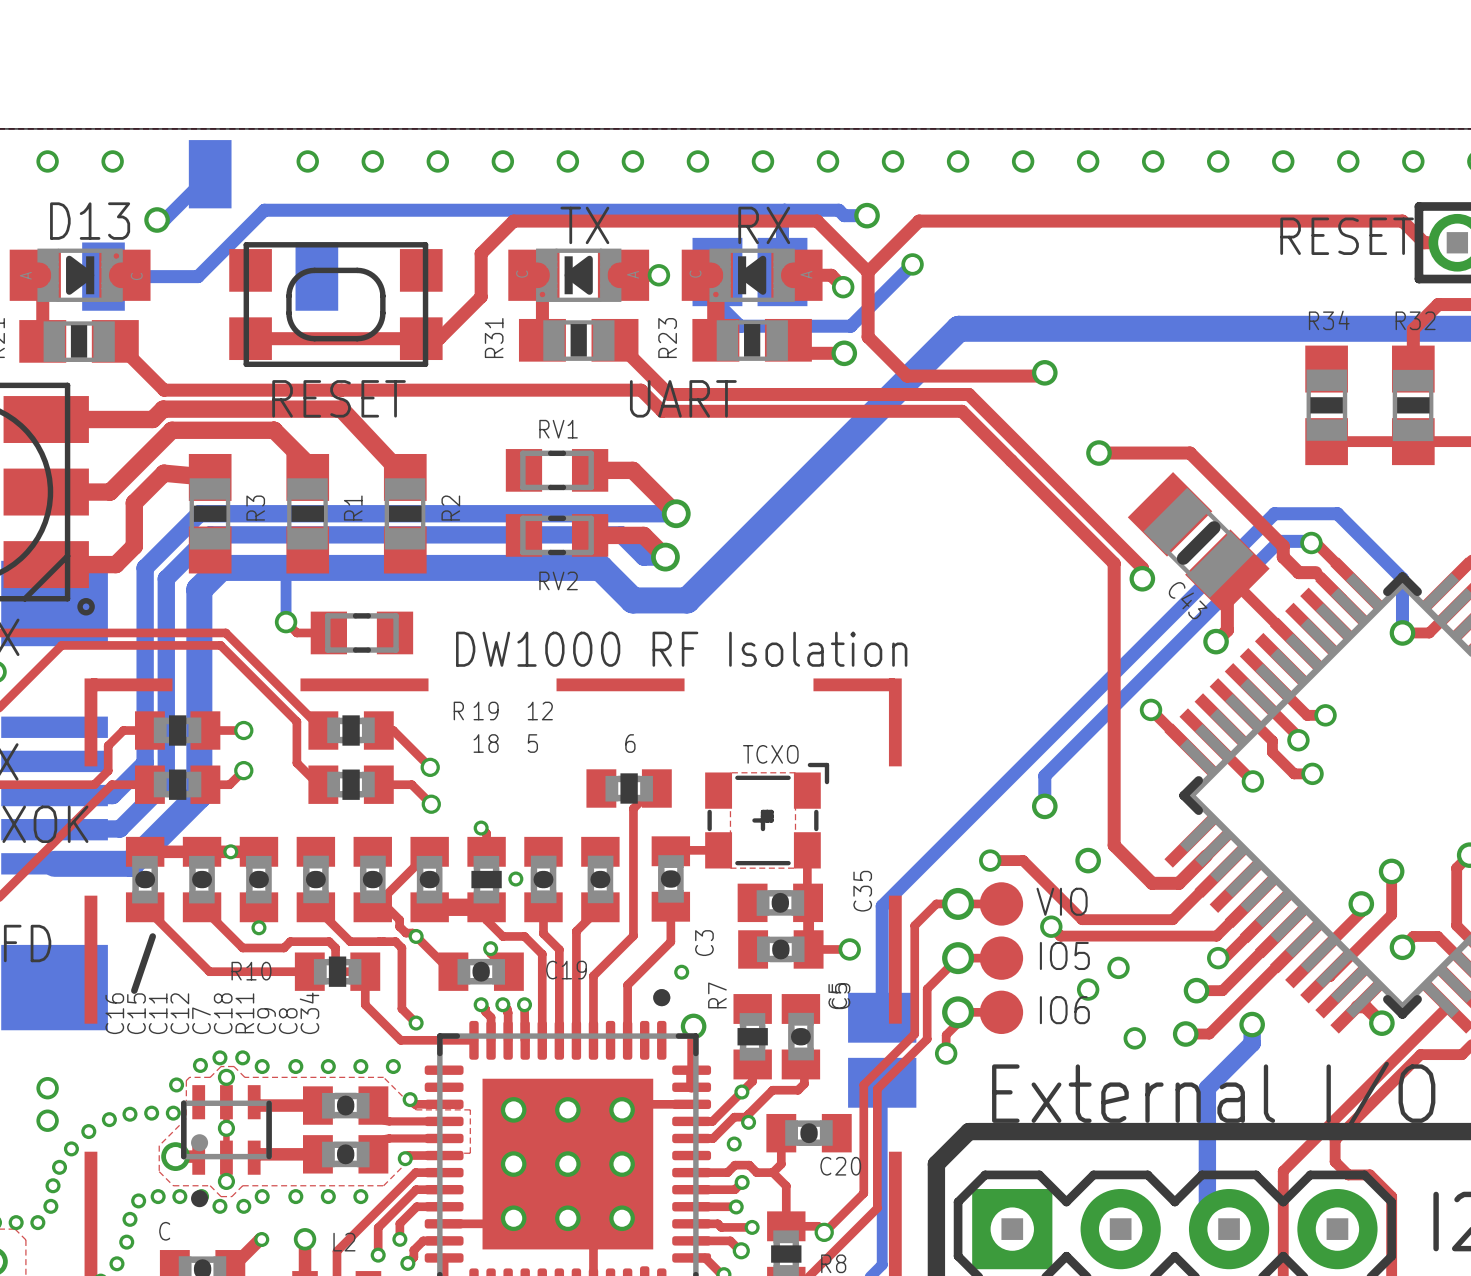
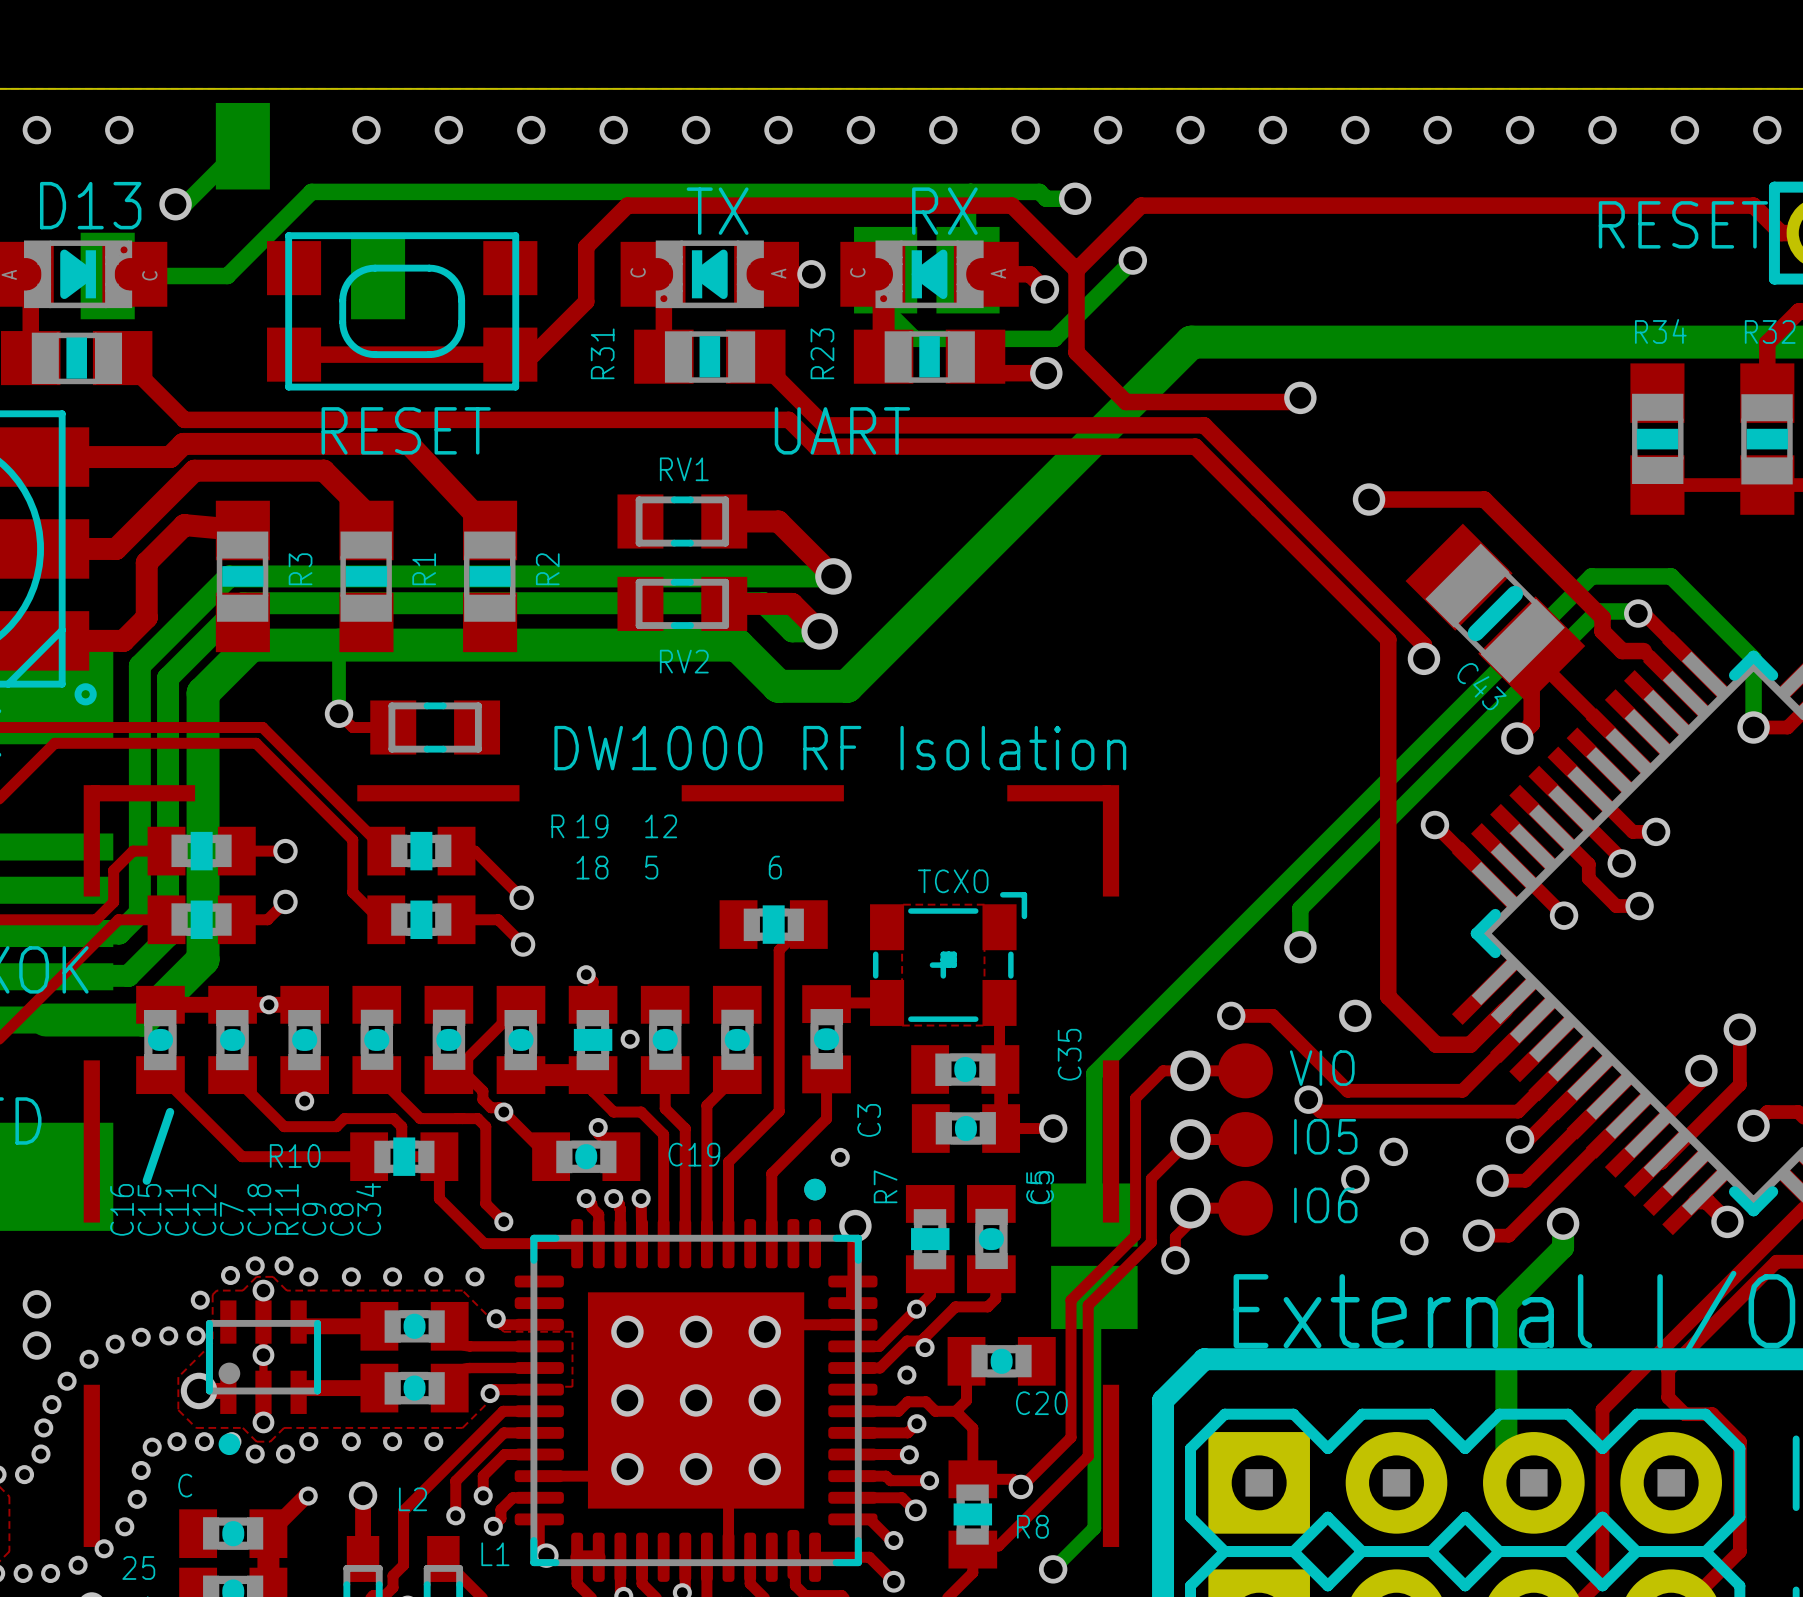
bottom track: (145, 567) (145, 763) (128, 779) -> (160, 645) (139, 665) (139, 912)
bottom track: (221, 567) (199, 589) (199, 795) (178, 816) -> (256, 645) (251, 645) (203, 693) (203, 959)
bottom track: (166, 578) (166, 782) (151, 797) -> (187, 658) (168, 678) (168, 936)

